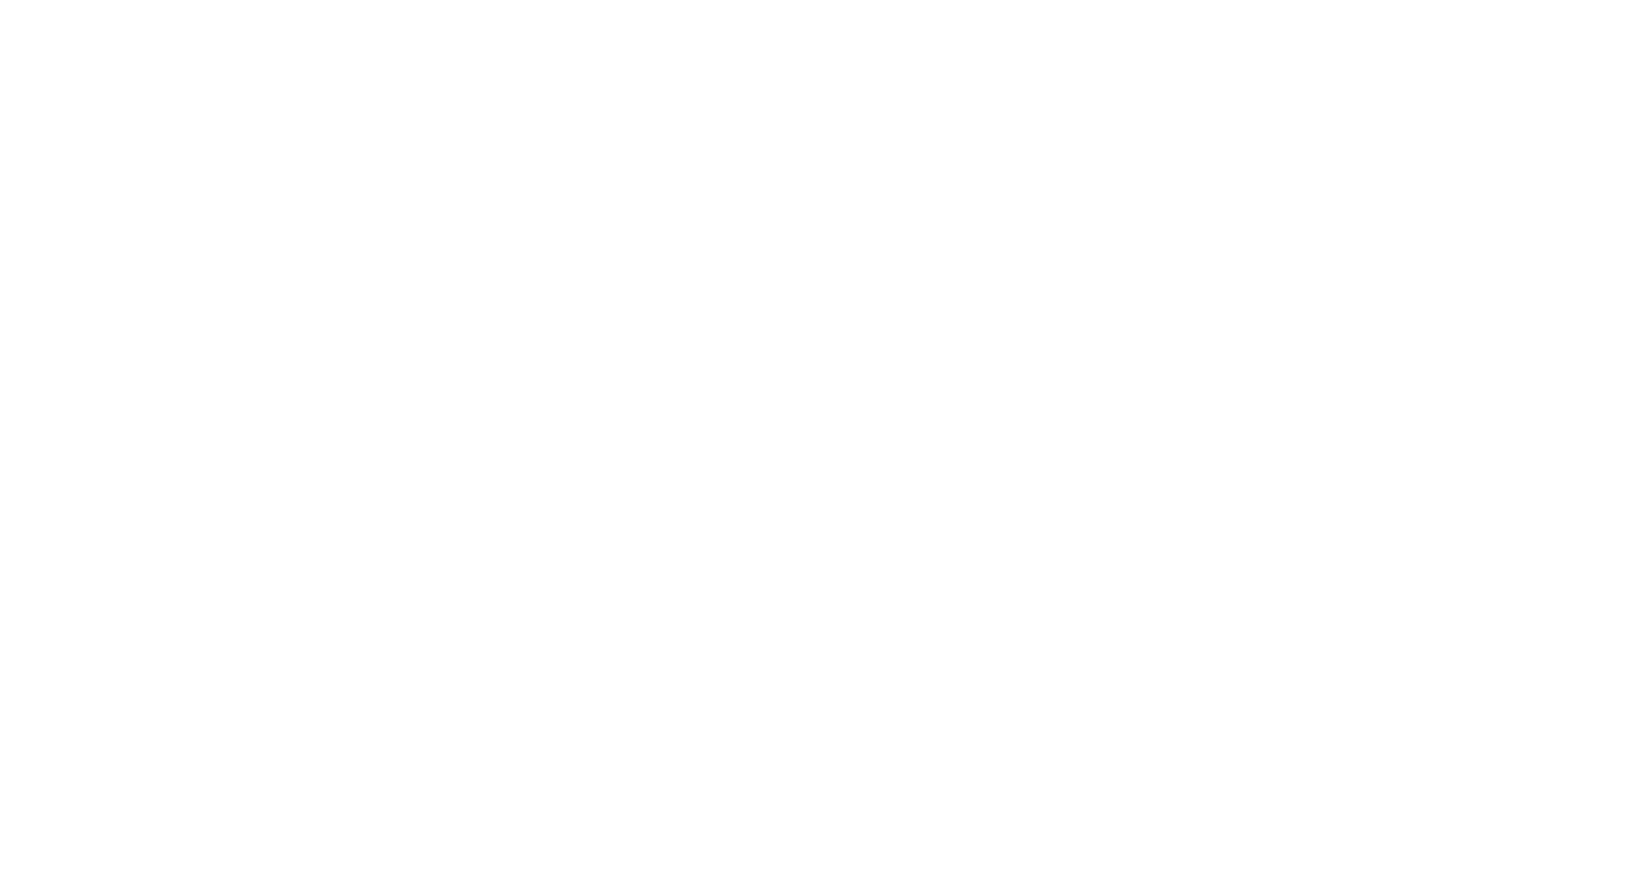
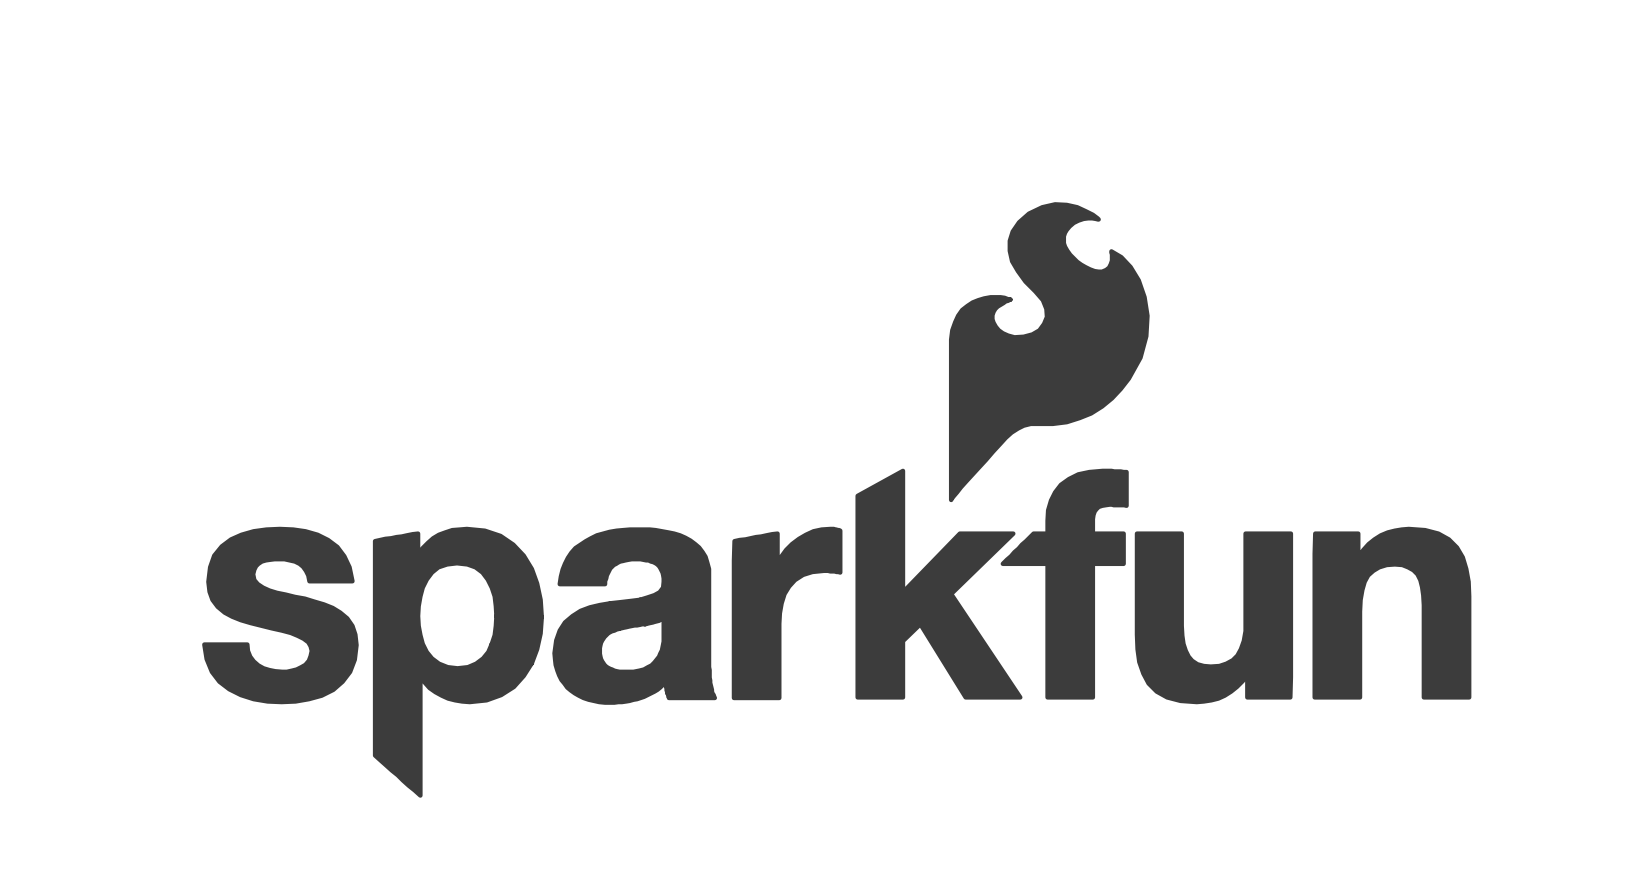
drawing: none -> [202, 202, 1472, 798]

